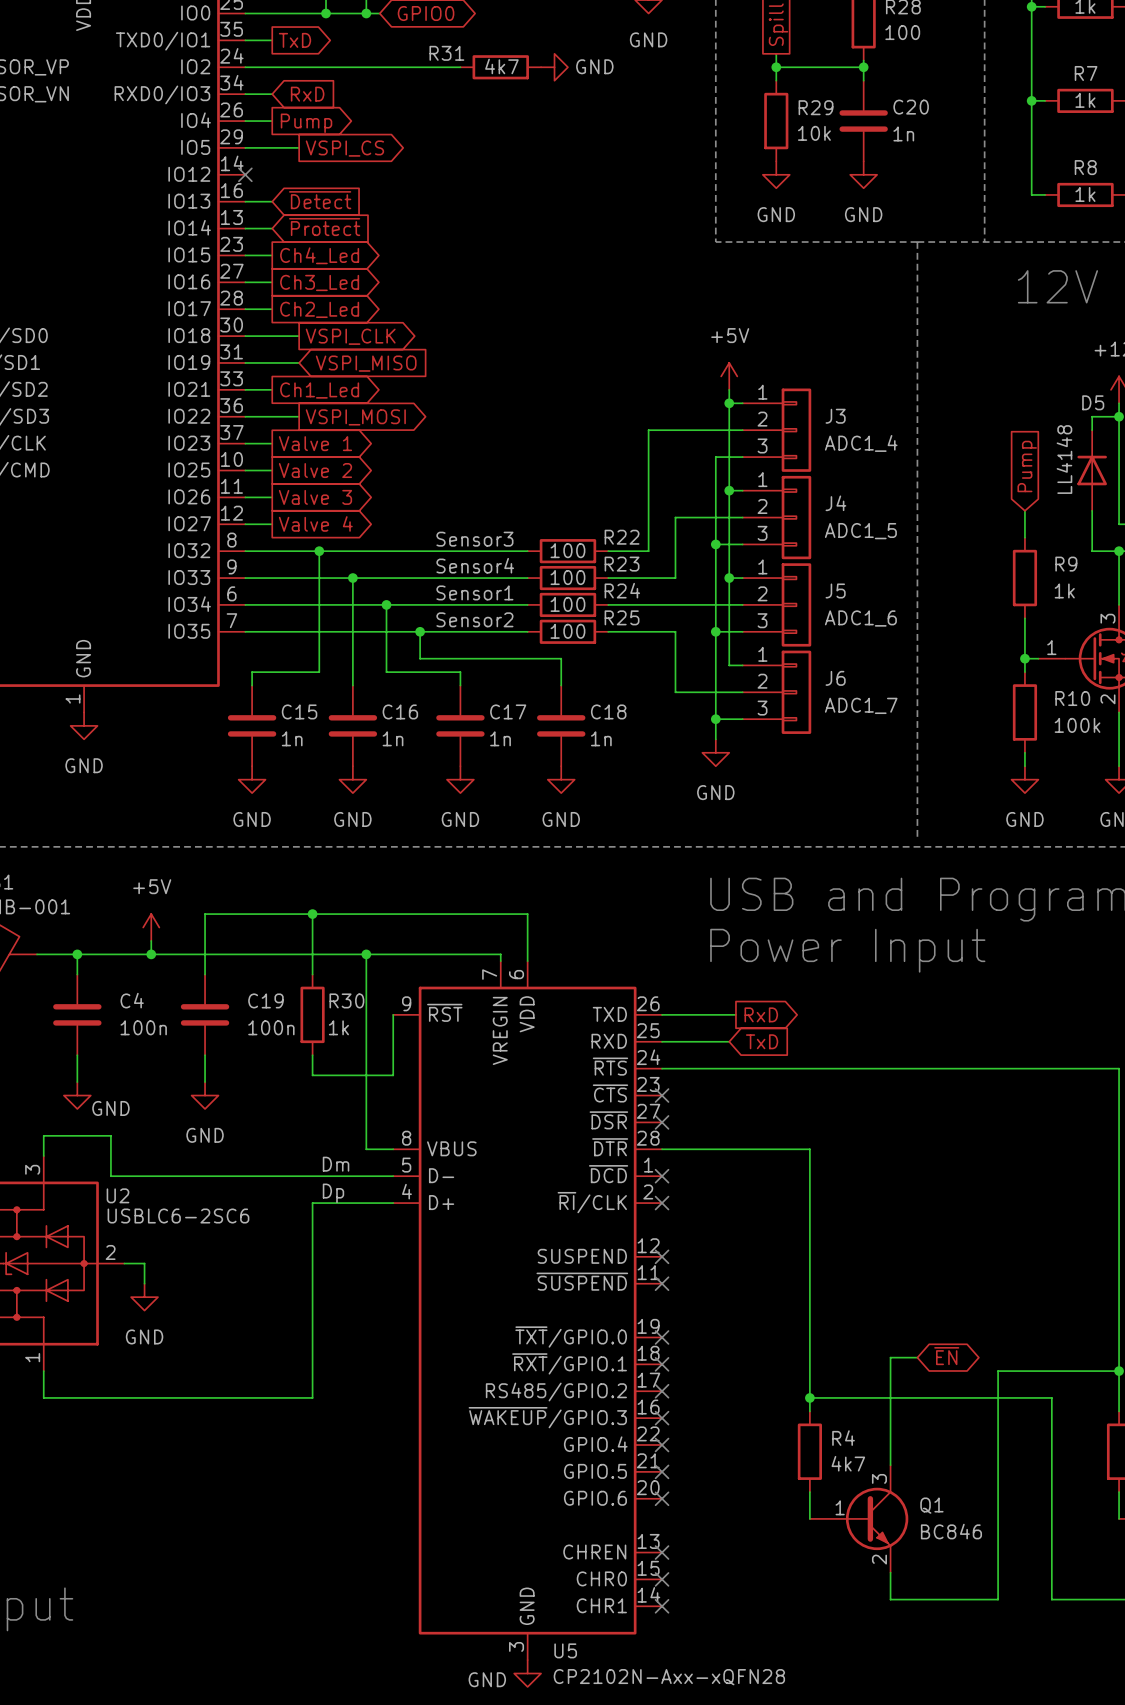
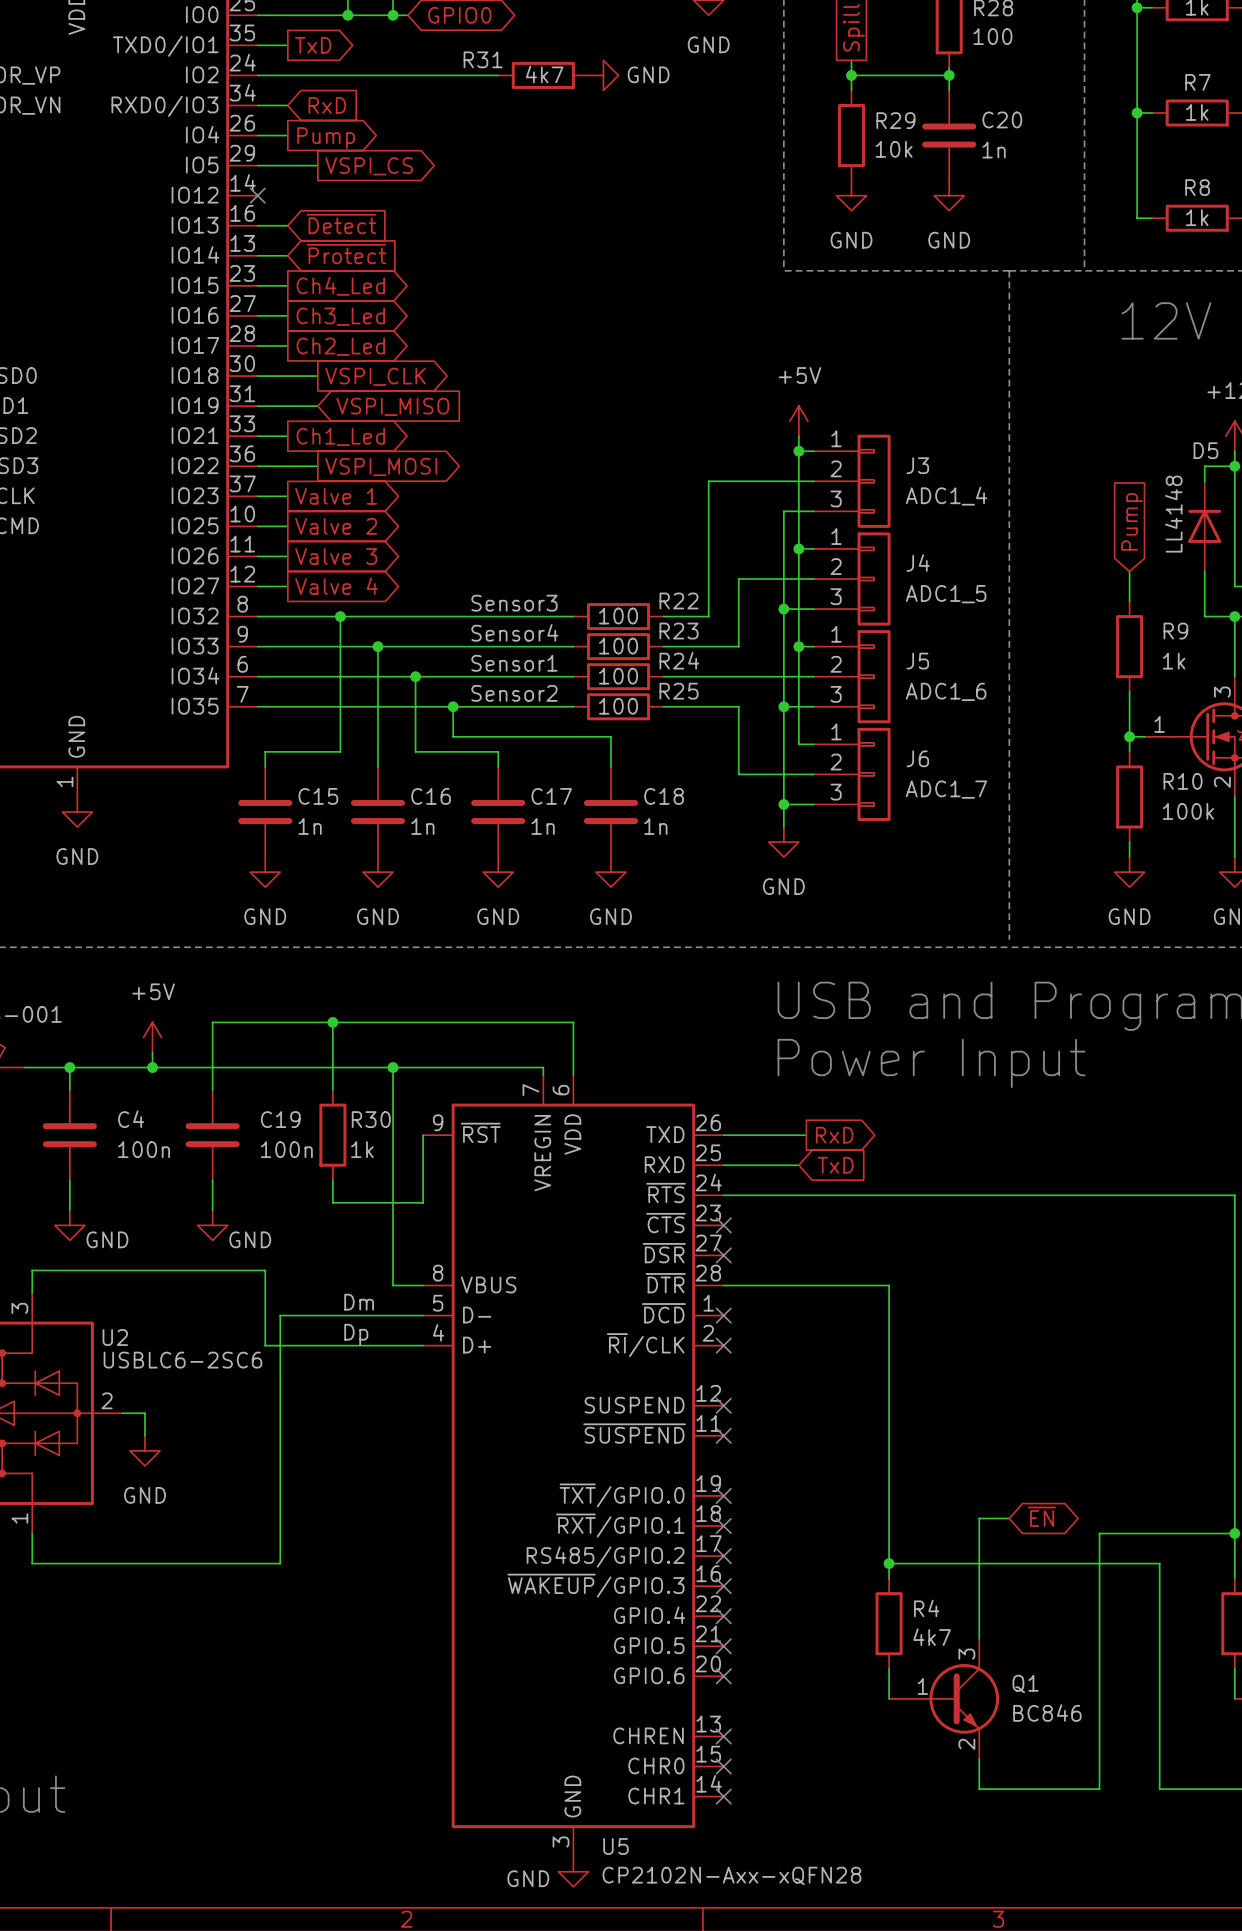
wire: (110, 1135) (110, 1176) (265, 1176) -> (107, 1270) (265, 1270) (265, 1345) (332, 1345)
power symbol text position: GND (205, 1135) -> GND (250, 1239)
wire: (312, 1203) (312, 1397) (265, 1397) -> (280, 1315) (280, 1563)

